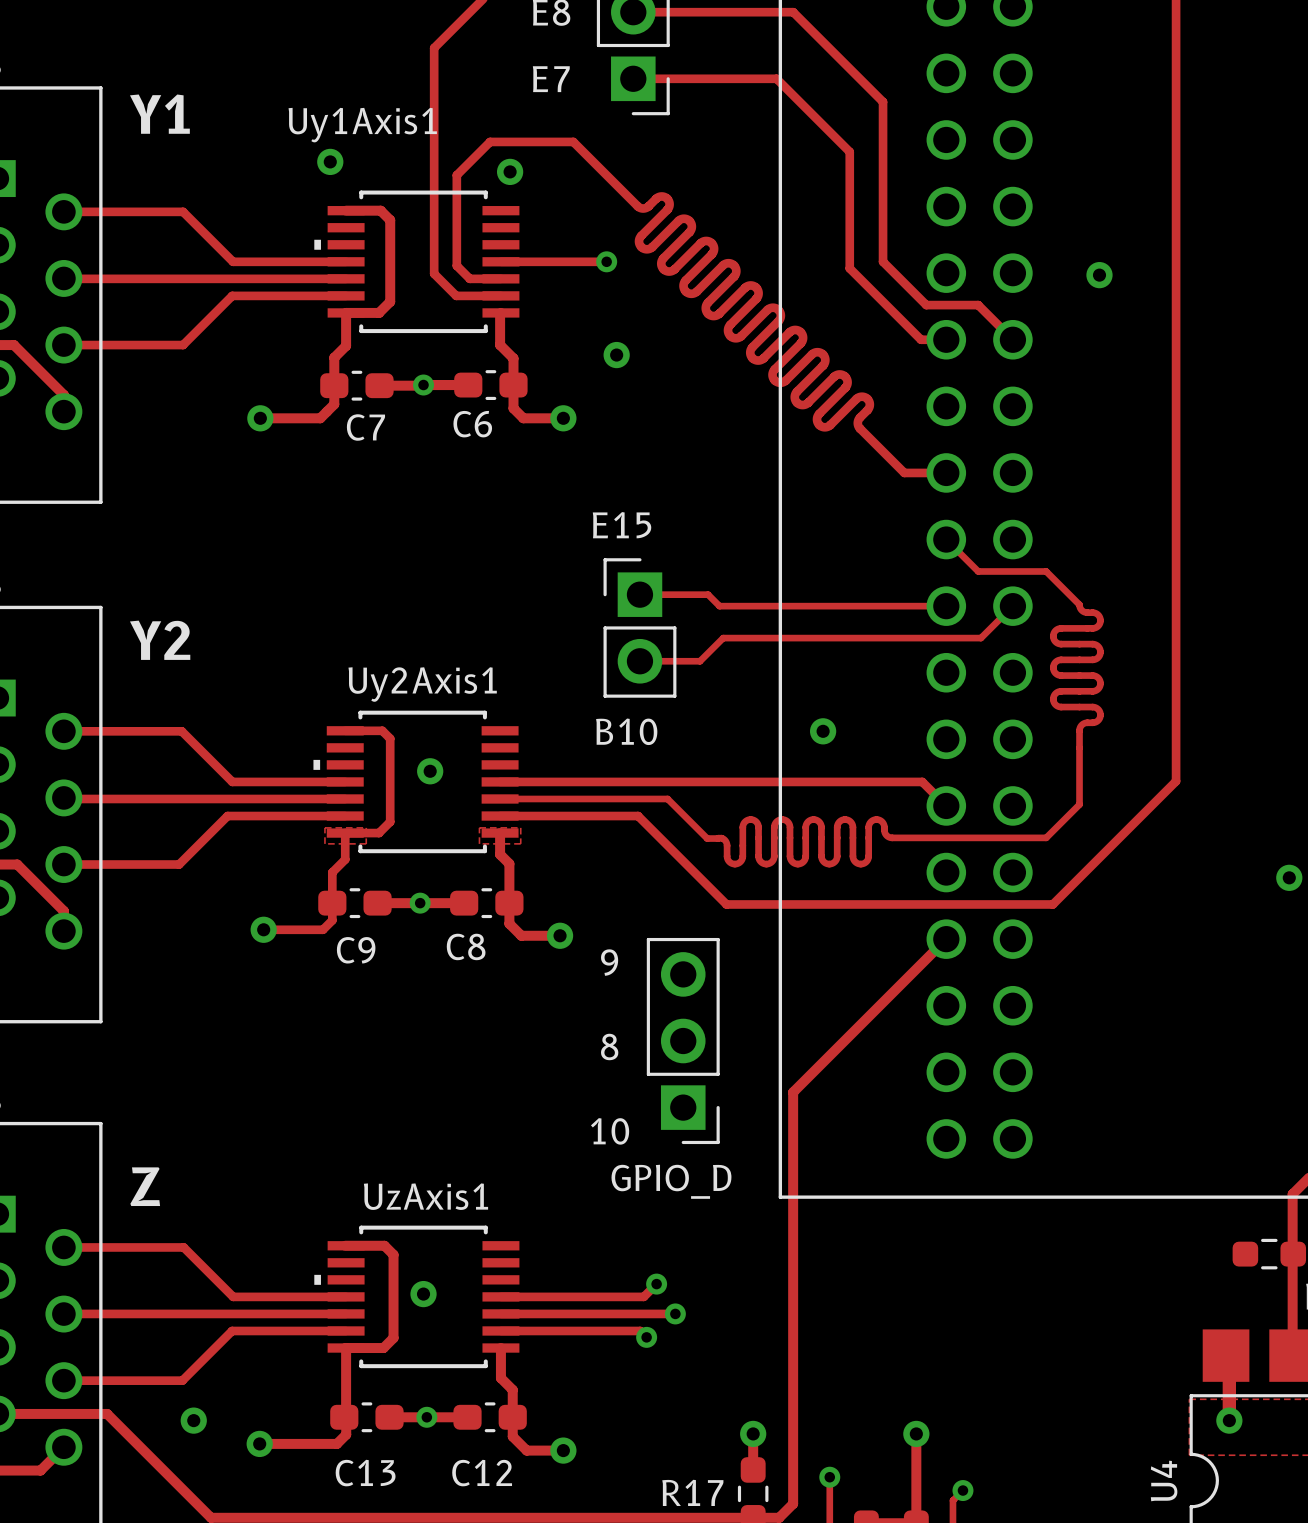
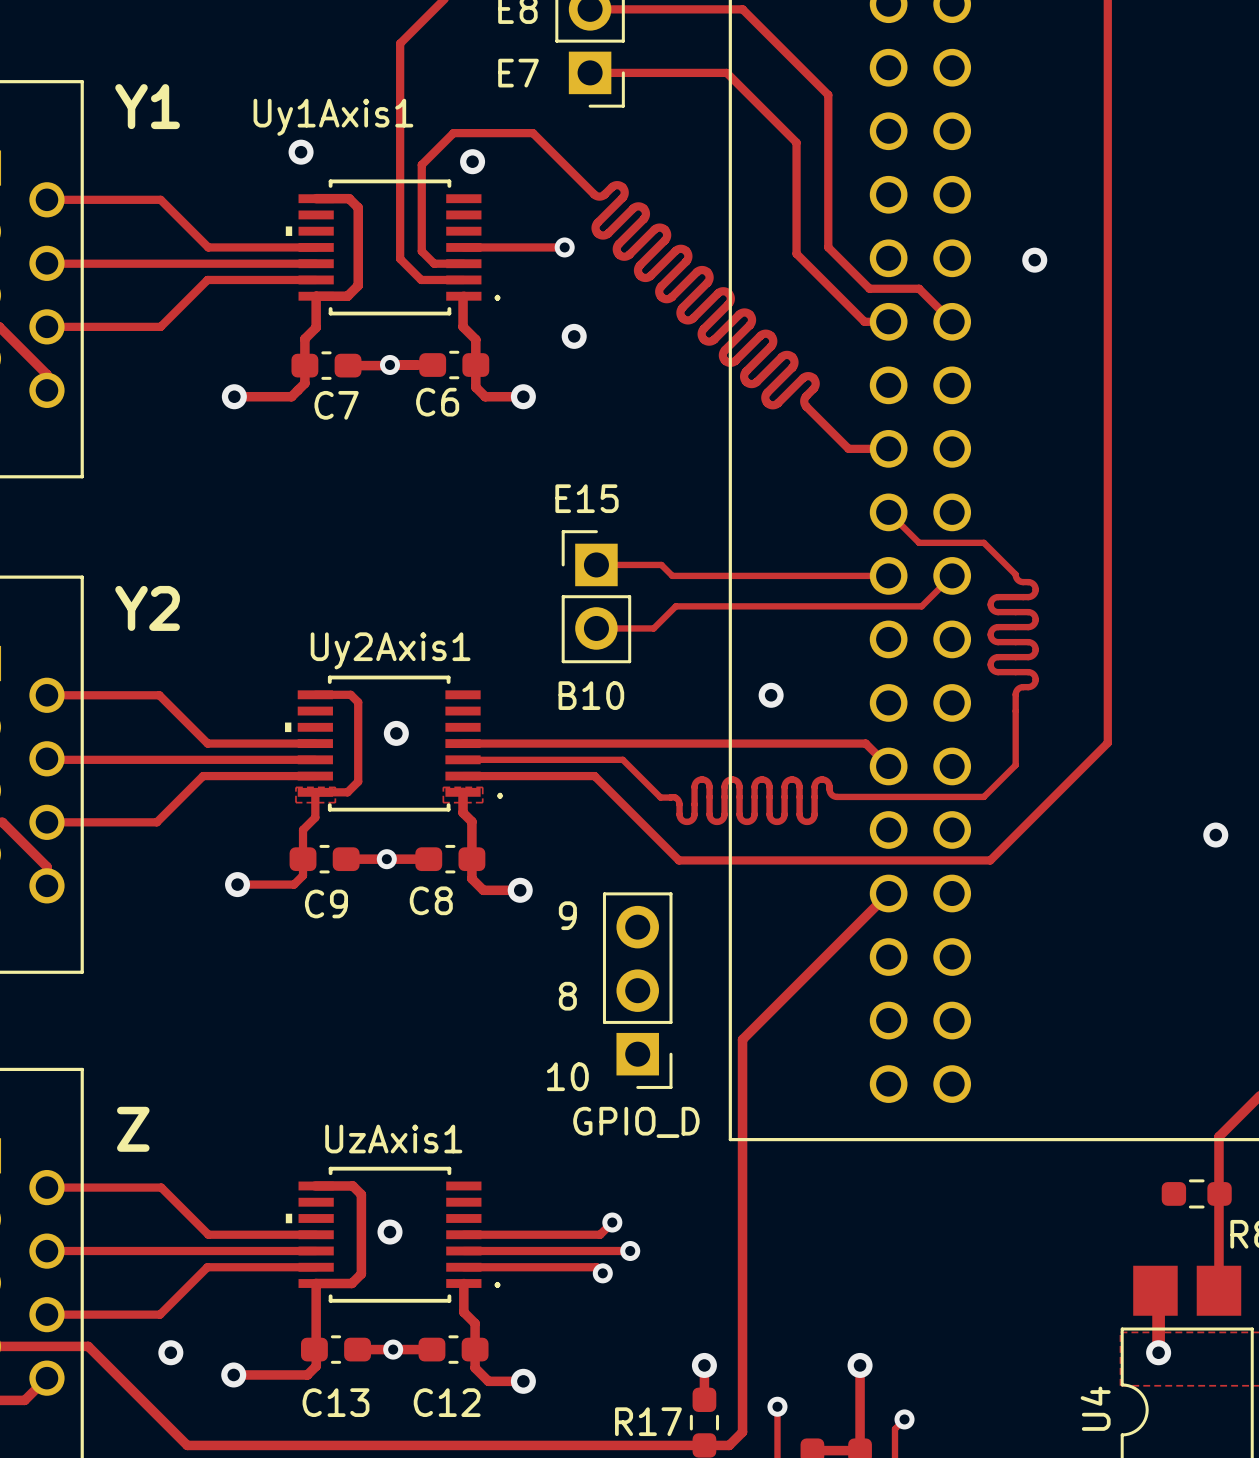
text: none -> . (497, 297)
text: none -> . (500, 795)
text: none -> . (497, 1284)

